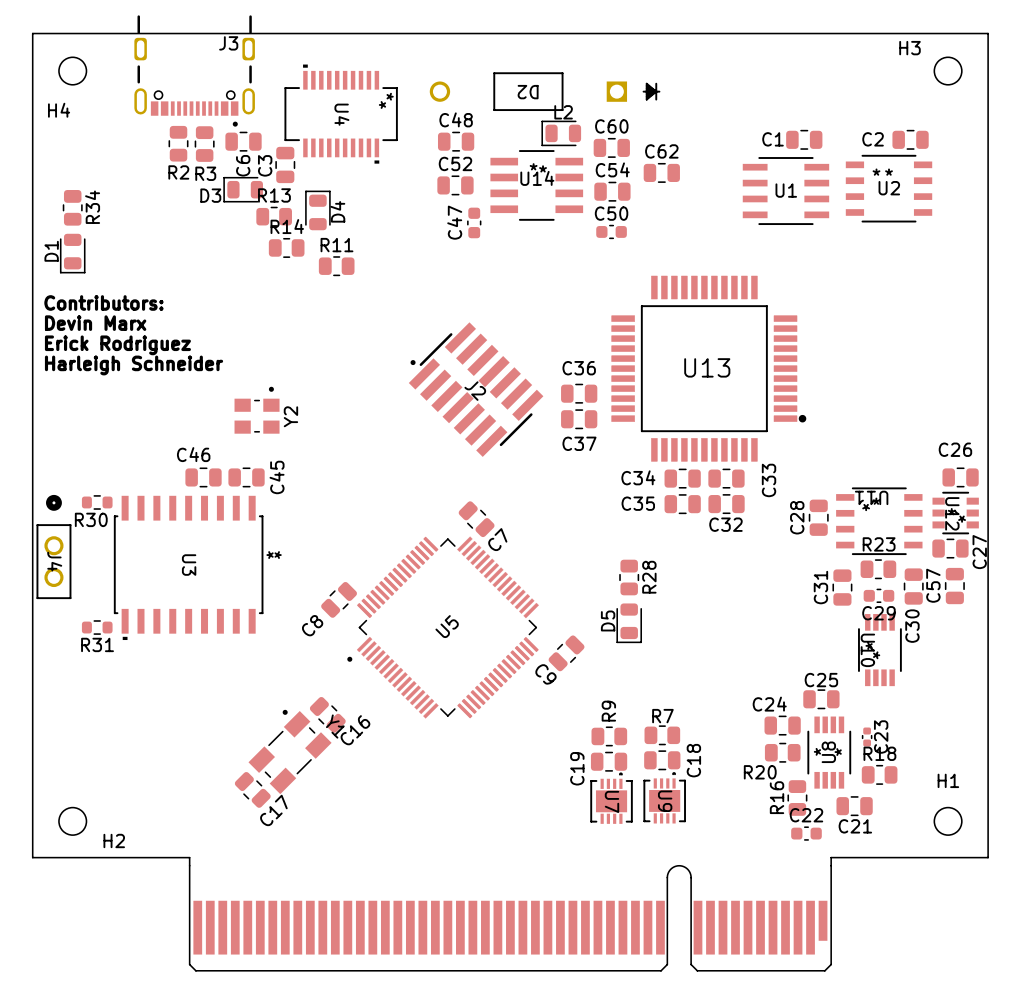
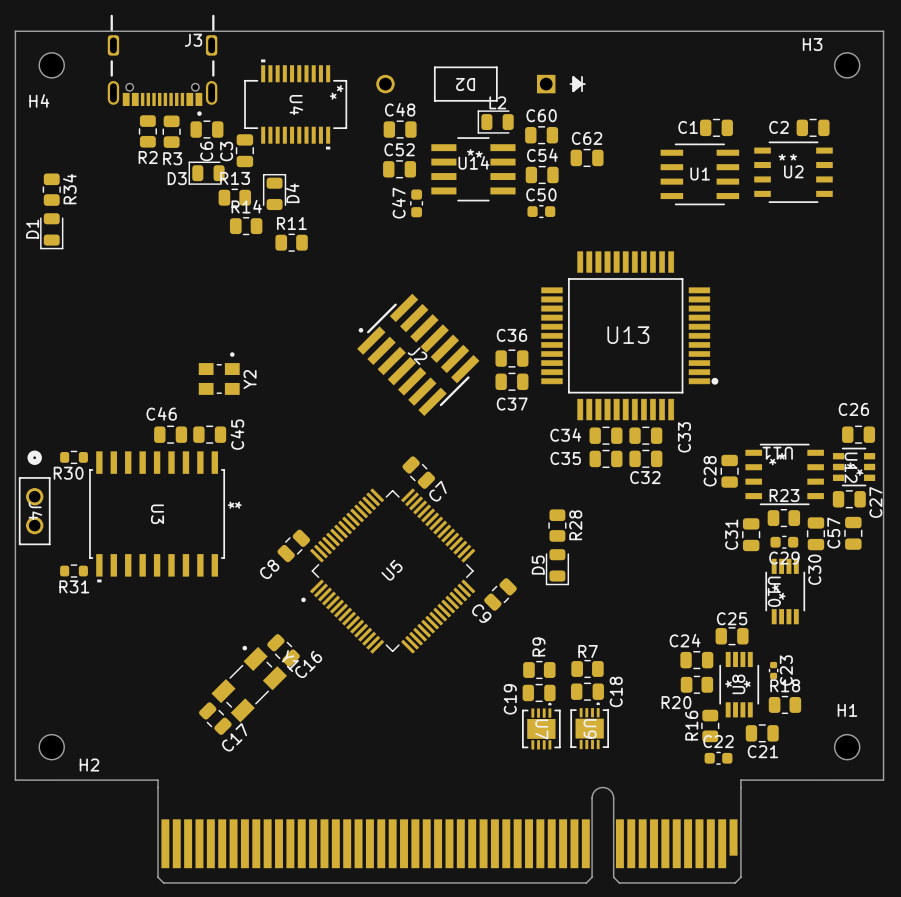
text: Contributors: (103, 302) -> none
text: Devin Marx (95, 323) -> none
text: Erick Rodriguez (117, 345) -> none
text: Harleigh Schneider (134, 365) -> none

